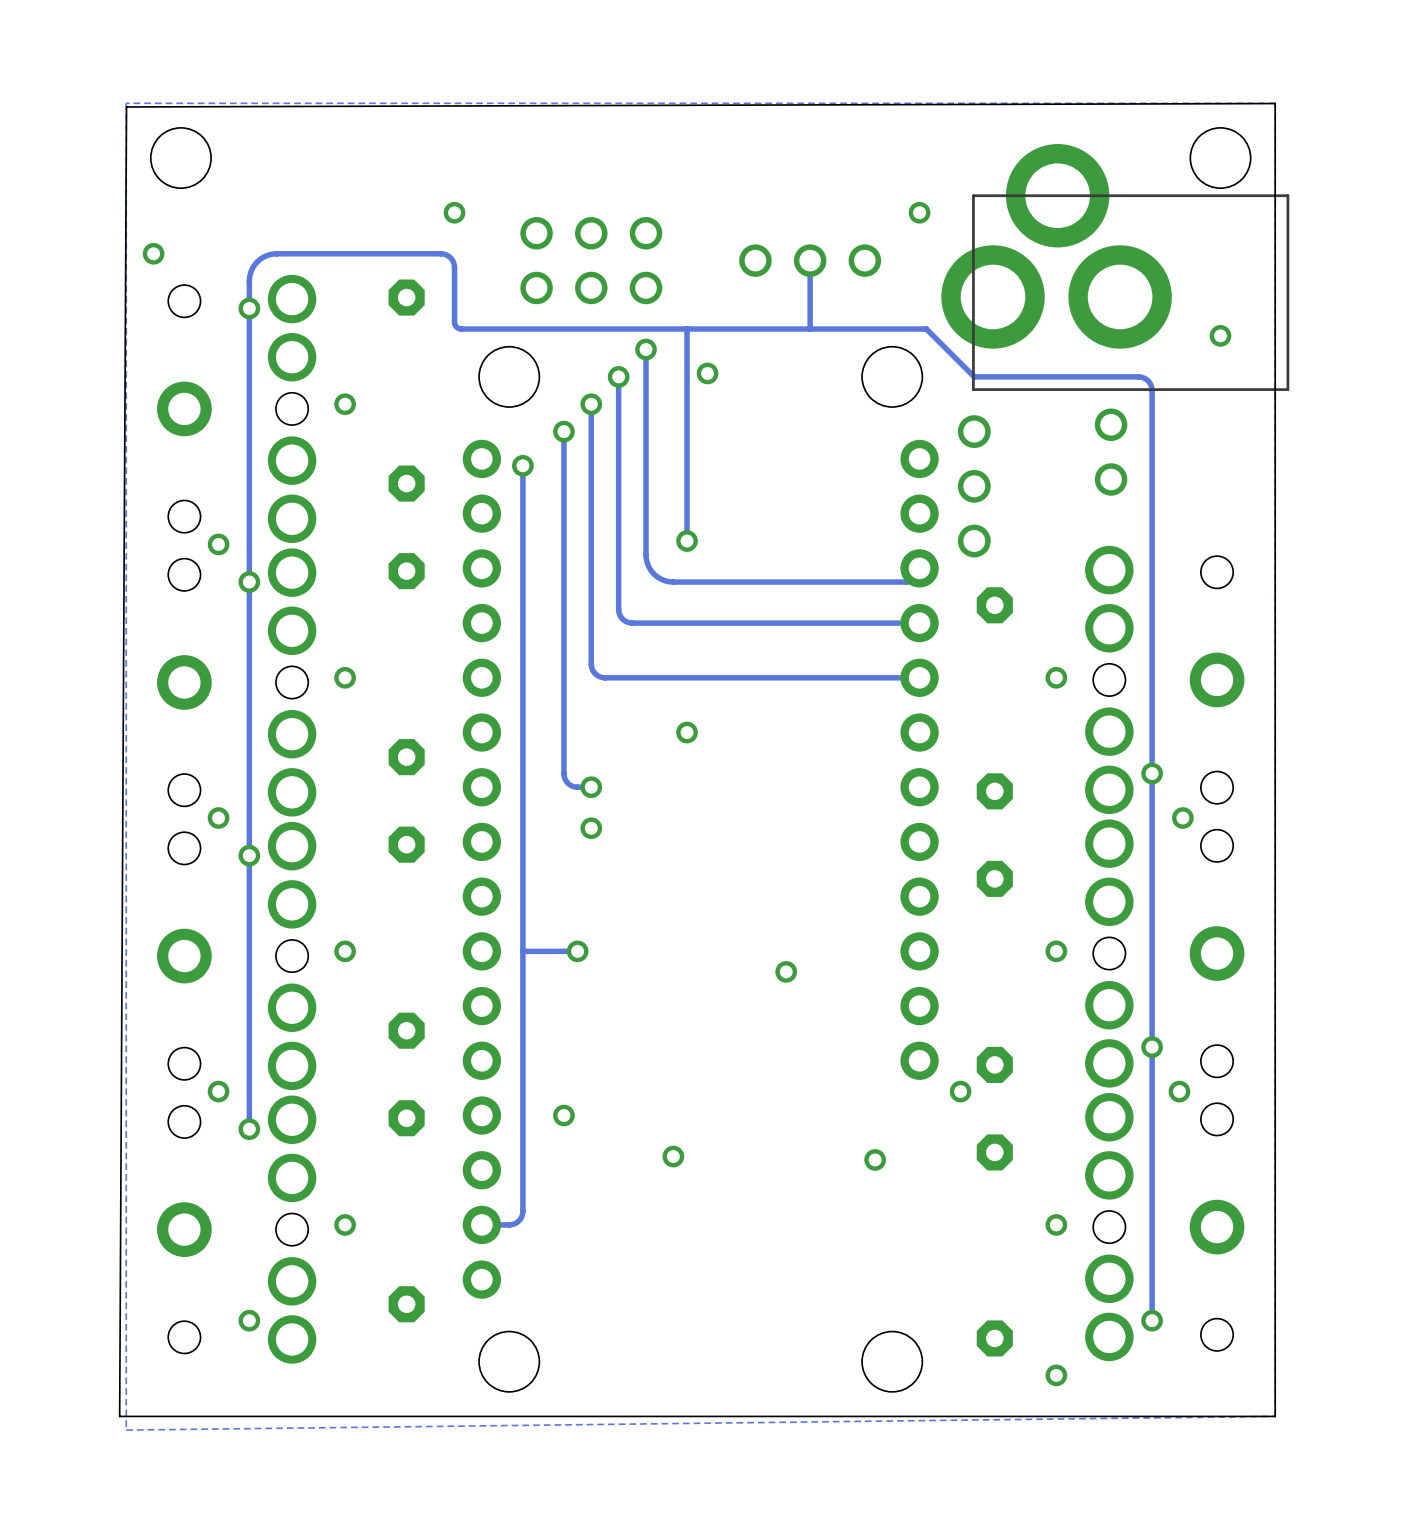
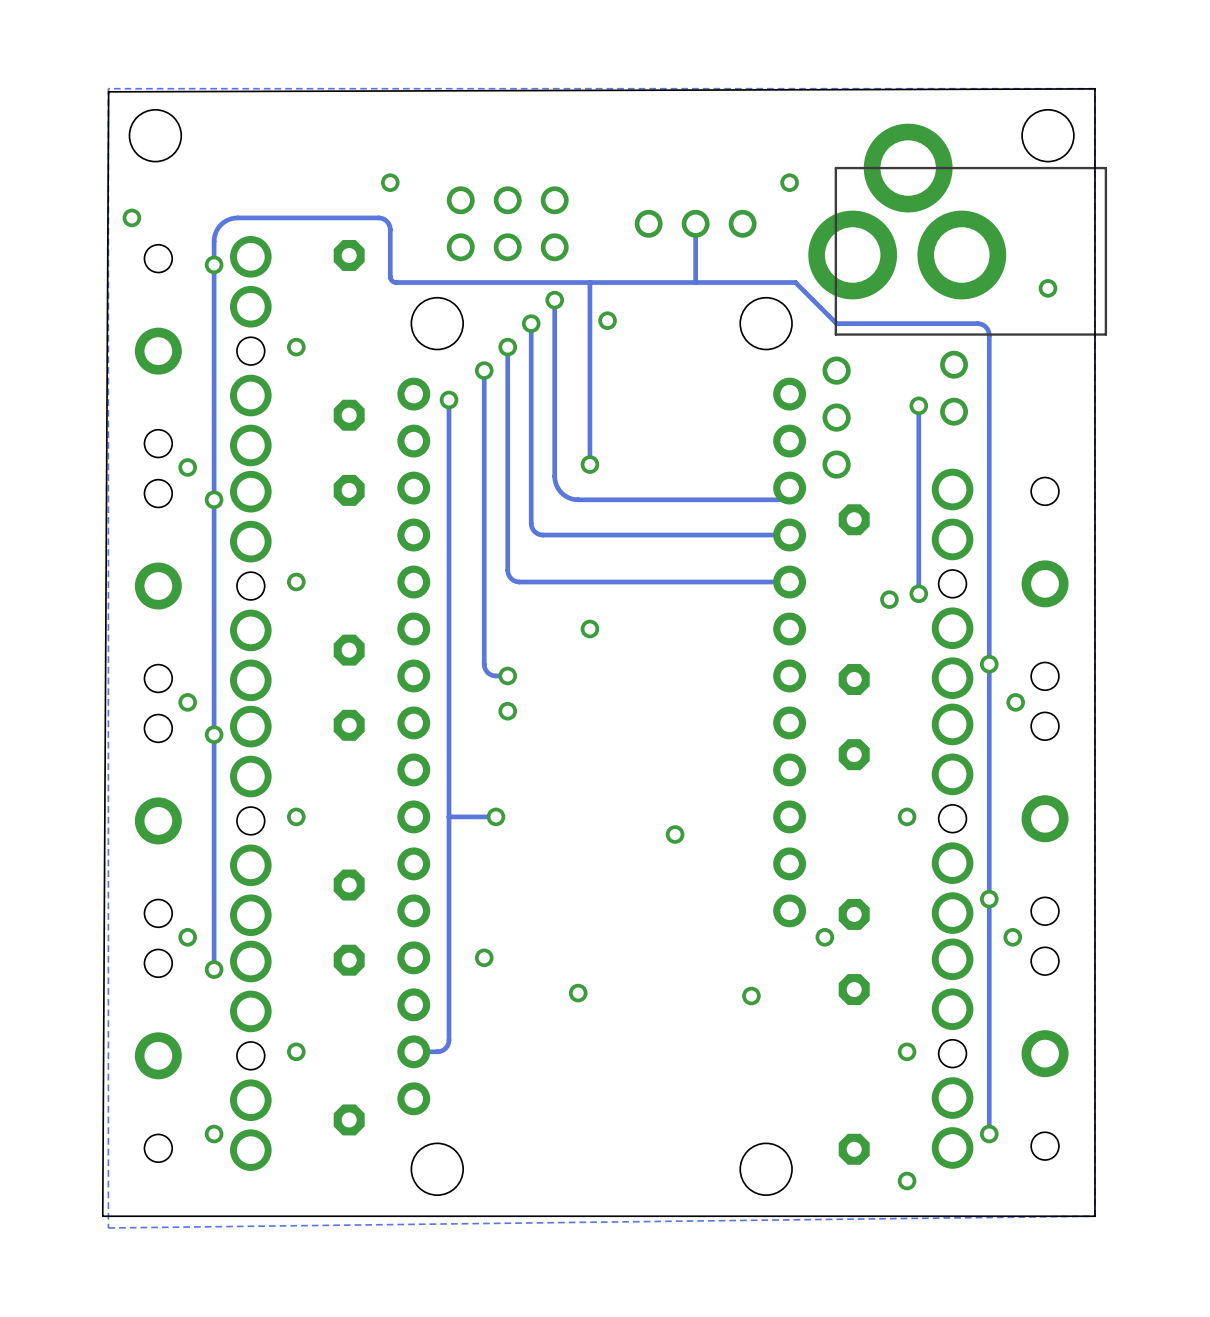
track: none -> (918, 405) (918, 593)
via: none -> (918, 405)
via: (1056, 677) -> none
via: none -> (918, 593)
via: none -> (889, 599)

